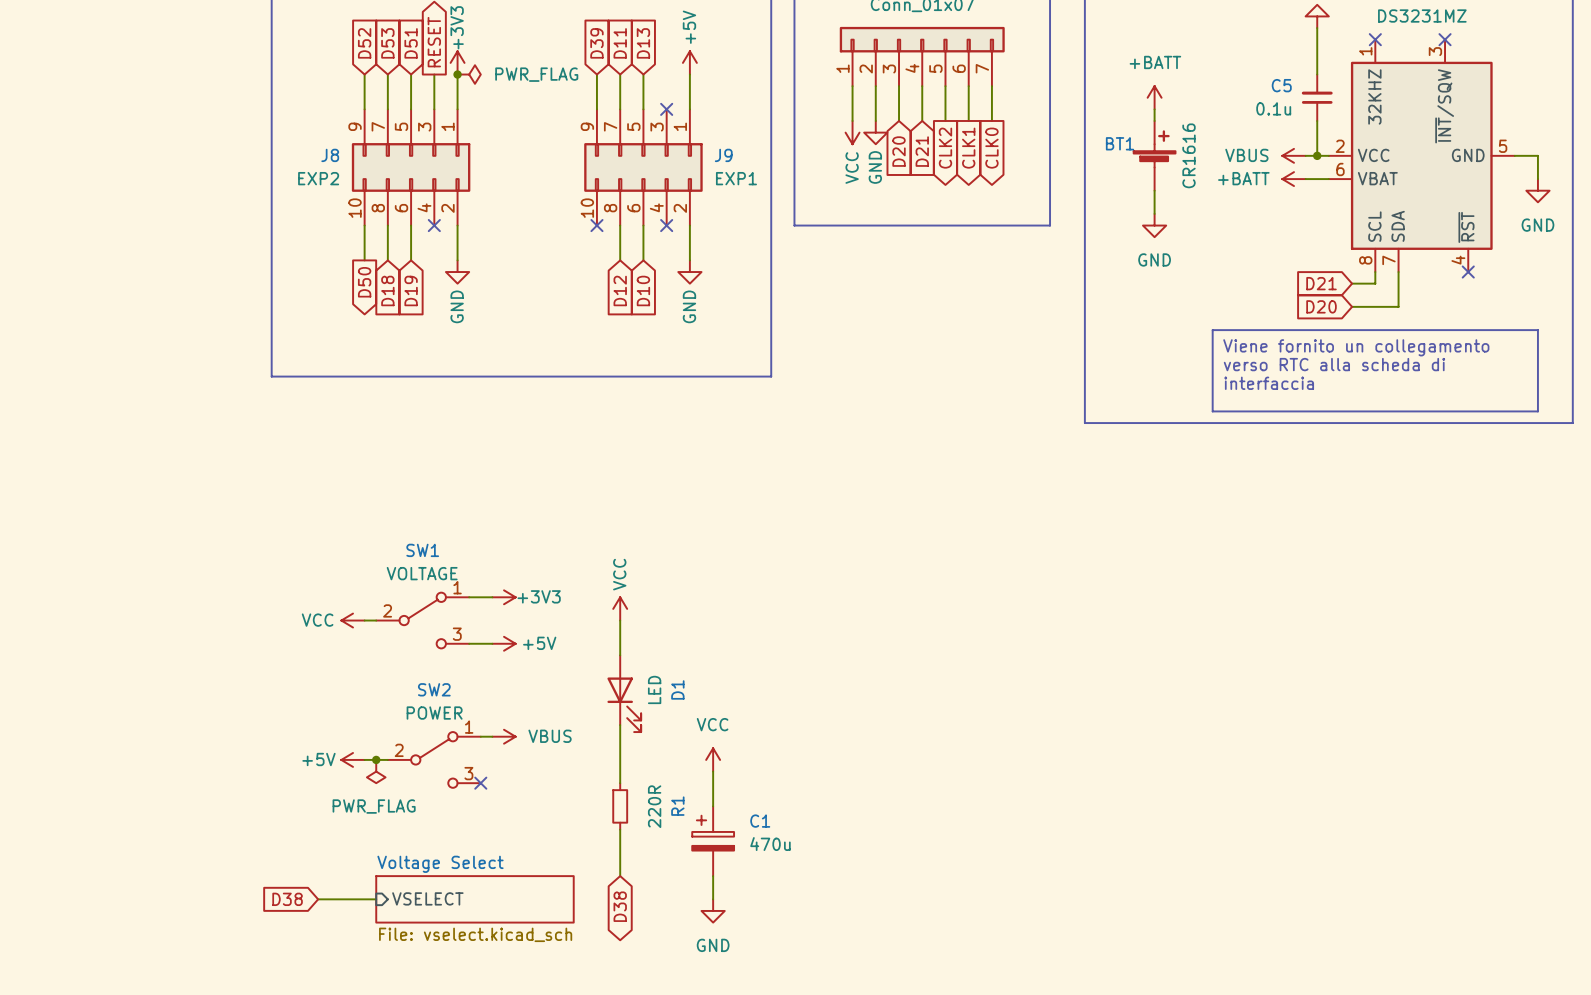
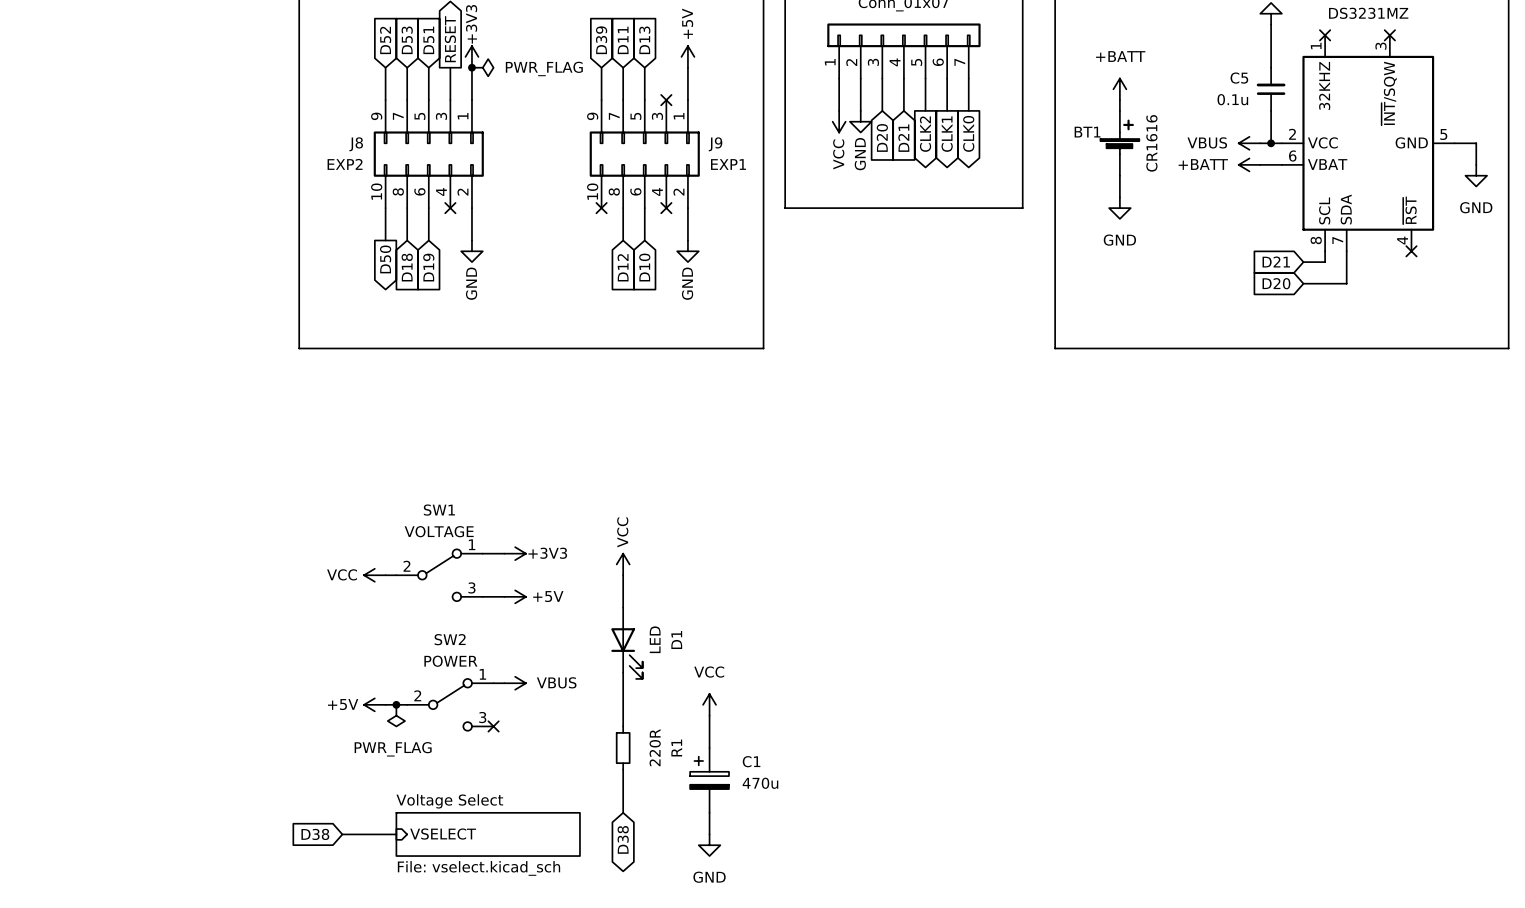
line: (1212, 330) (1537, 330) (1537, 411) (1212, 411) (1212, 330) -> none
text: Viene fornito un collegamento (1356, 347) -> none
text: verso RTC alla scheda di (1334, 364) -> none
line: (1084, 376) (1084, 423) (1572, 423) (1572, 376) -> (1055, 348) (1508, 348)
text: interfaccia (1269, 383) -> none

